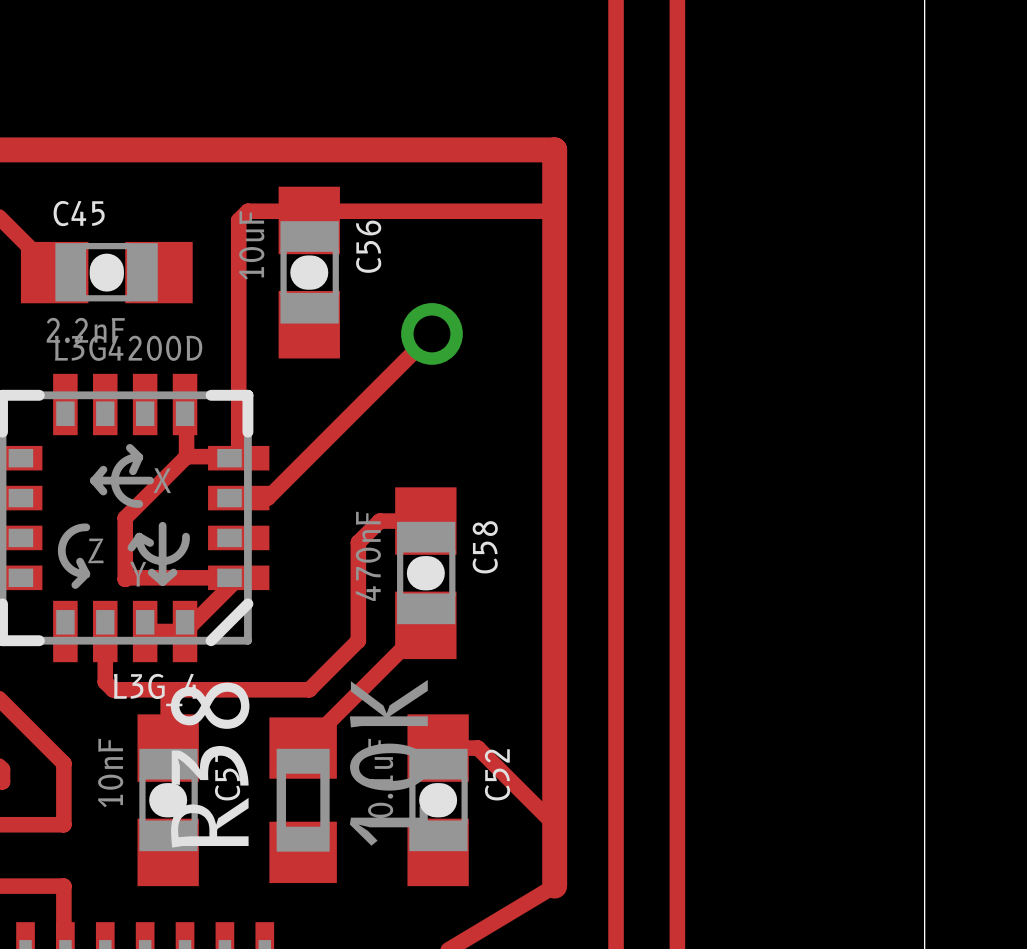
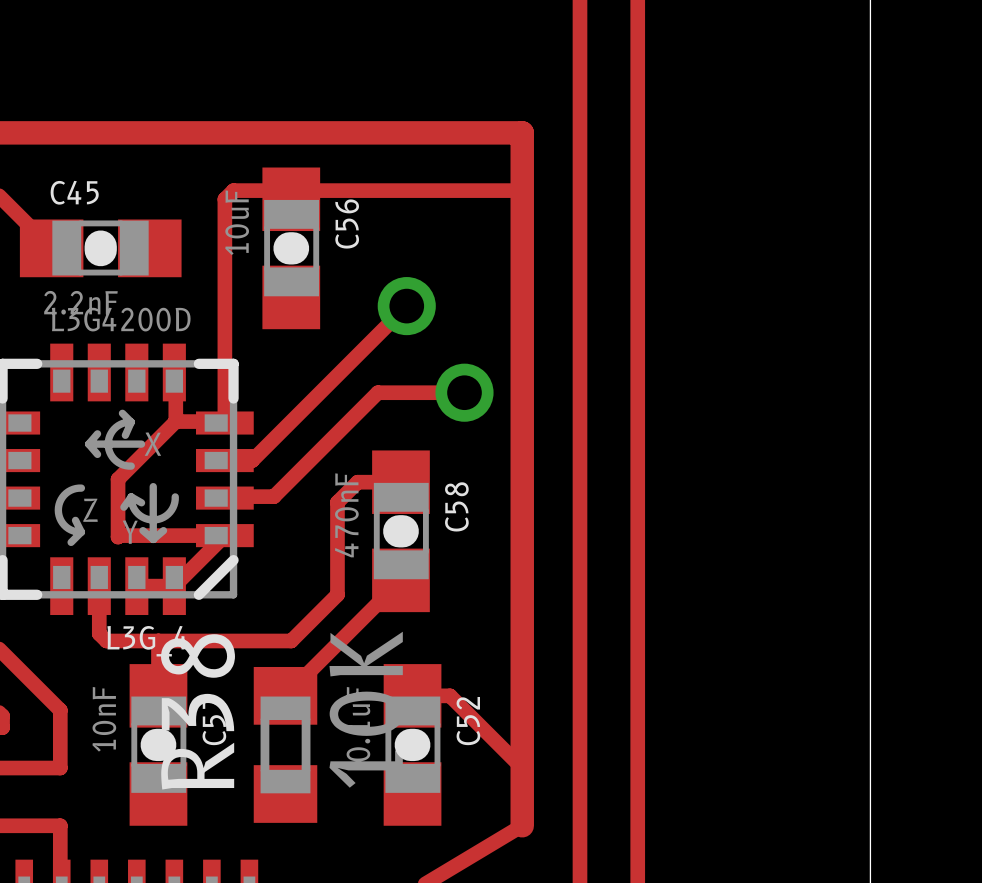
track: none -> (464, 392) (377, 392) (273, 496) (224, 498)
via: none -> (464, 392)

